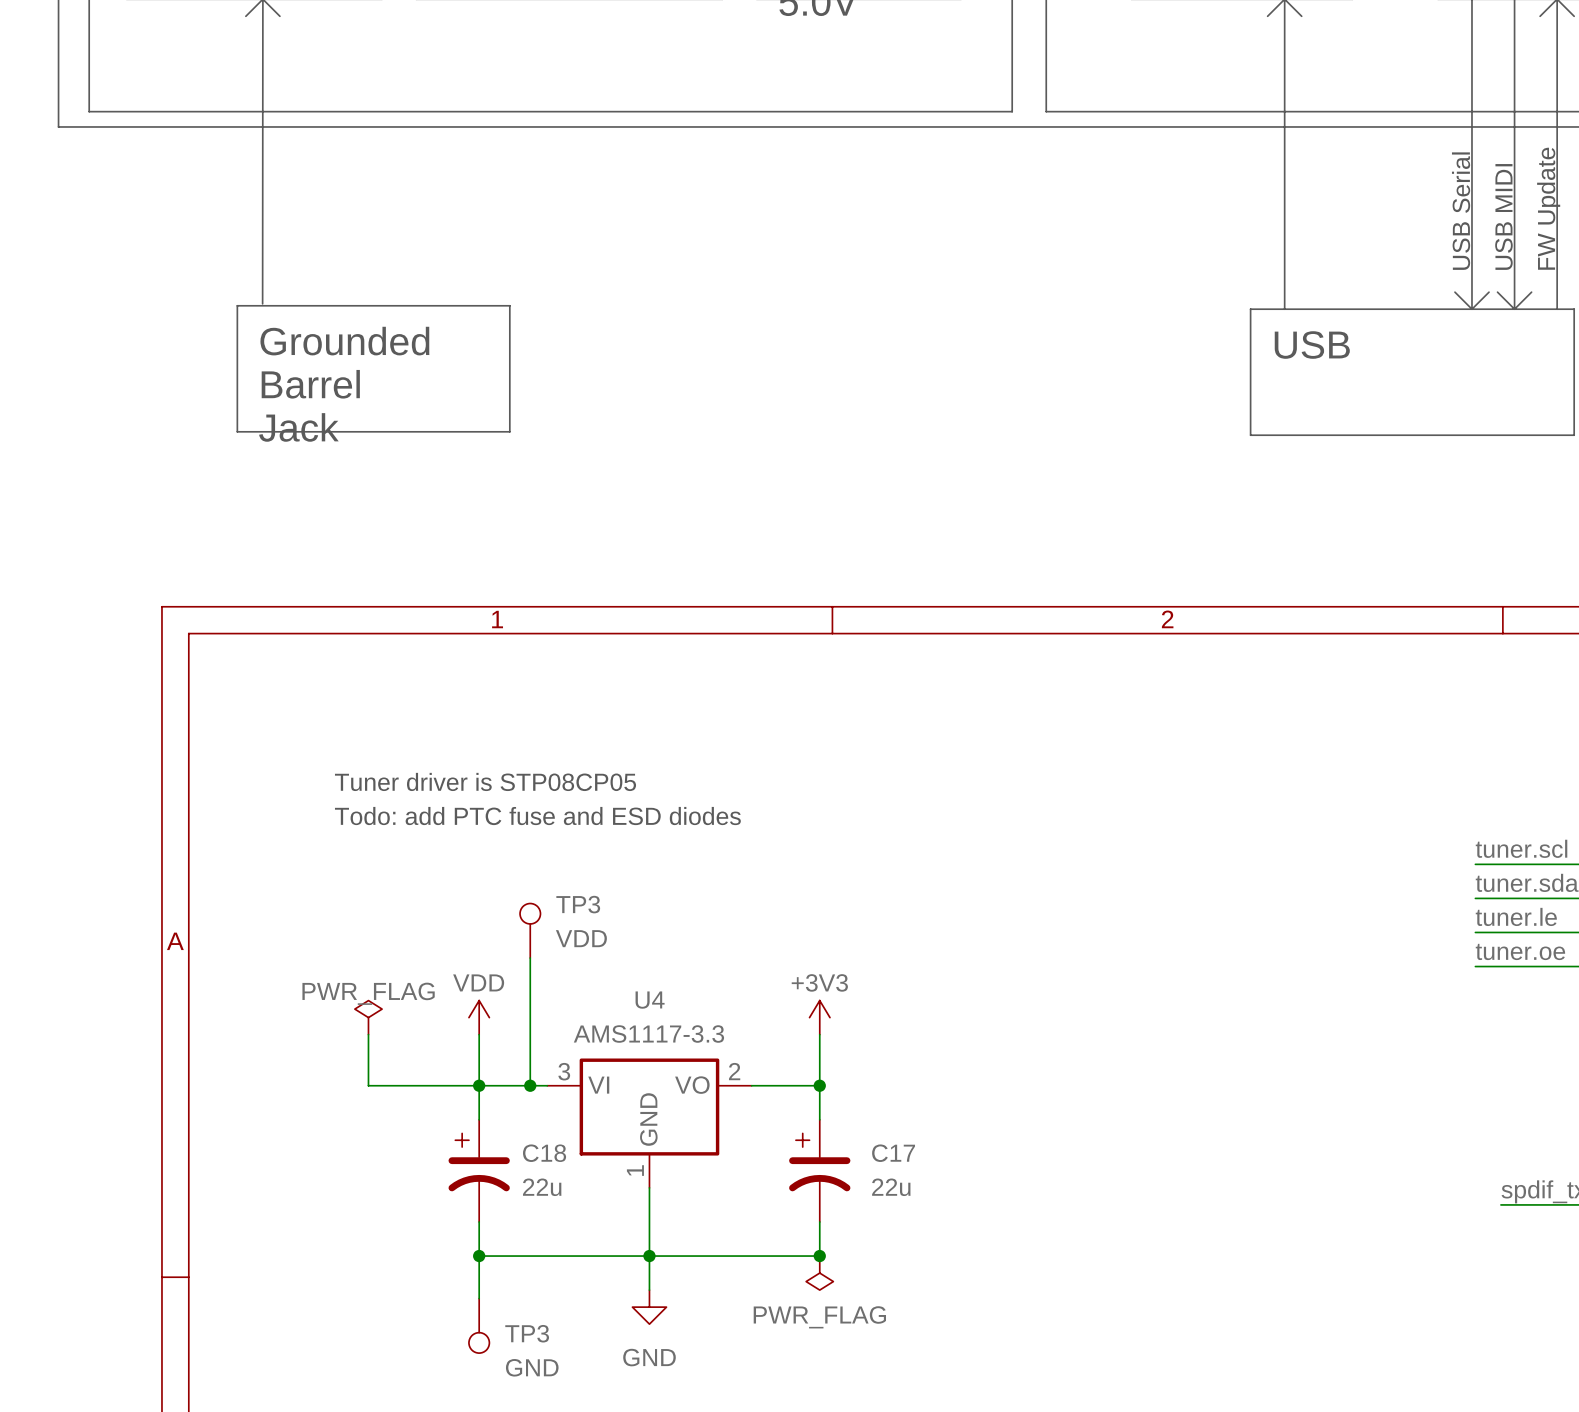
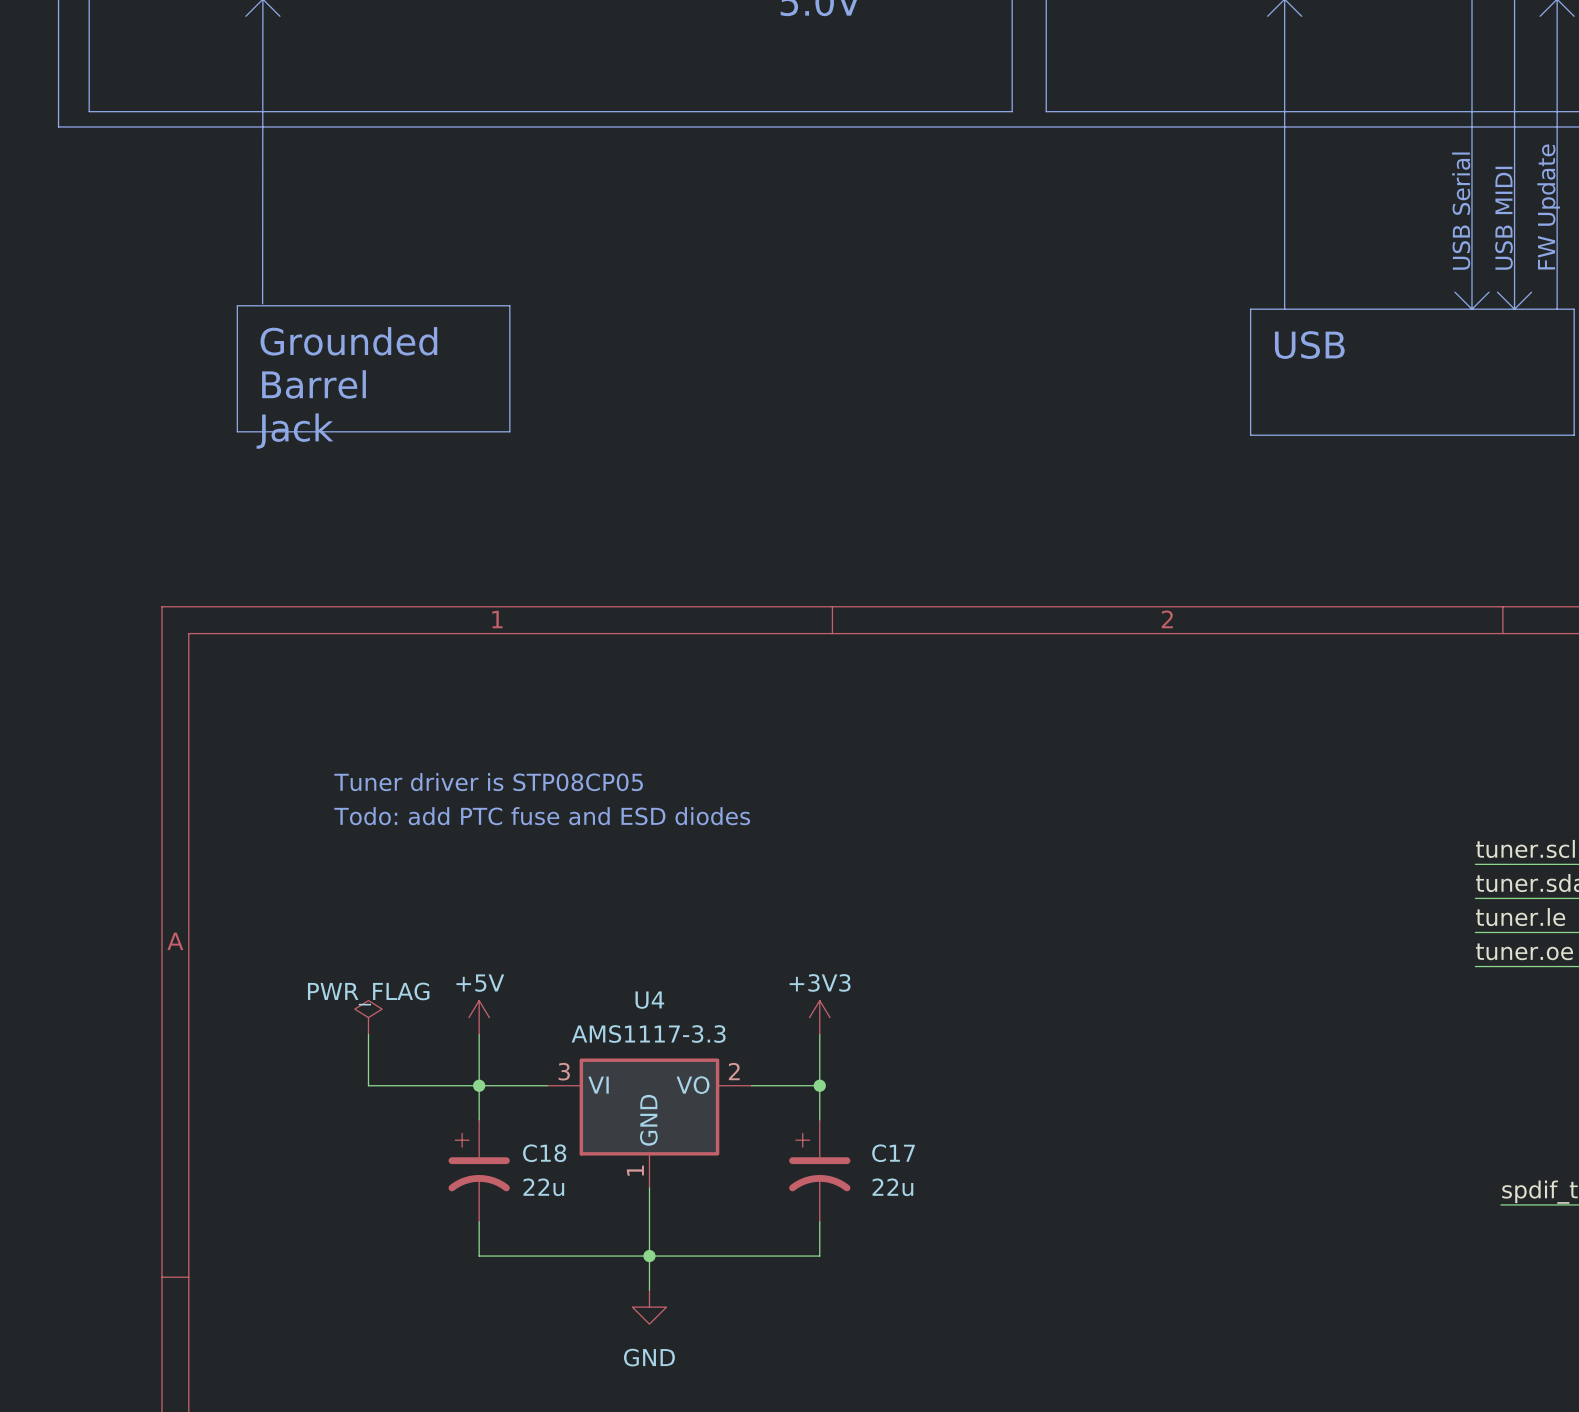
TP3: VDD (530, 930) -> none
wire: (530, 958) (530, 1085) -> none
power symbol: VDD (479, 1017) -> +5V (479, 1017)
junction: (530, 1085) -> none
wire: (479, 1256) (479, 1298) -> none
junction: (479, 1256) -> none
junction: (819, 1256) -> none
power symbol: PWR_FLAG (819, 1273) -> none
TP3: GND (479, 1325) -> none

